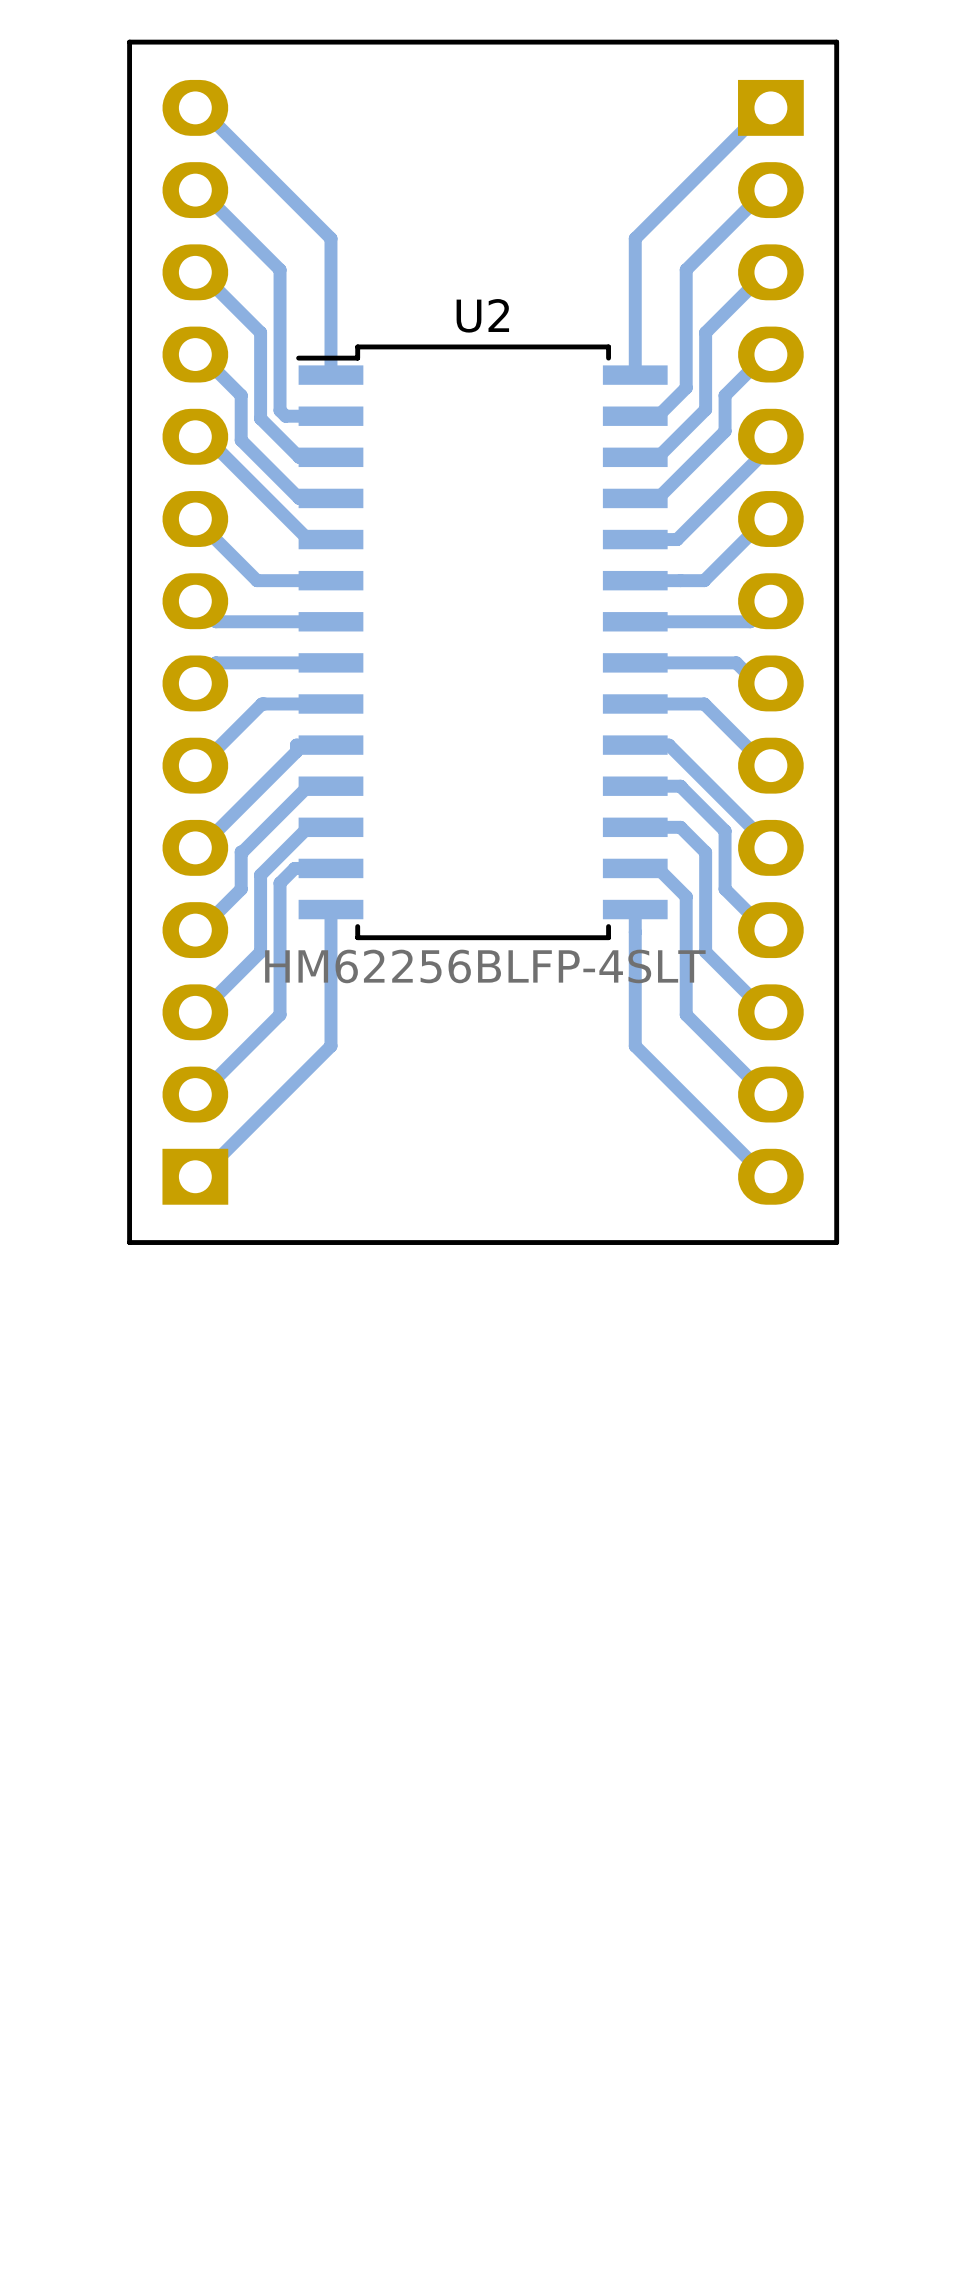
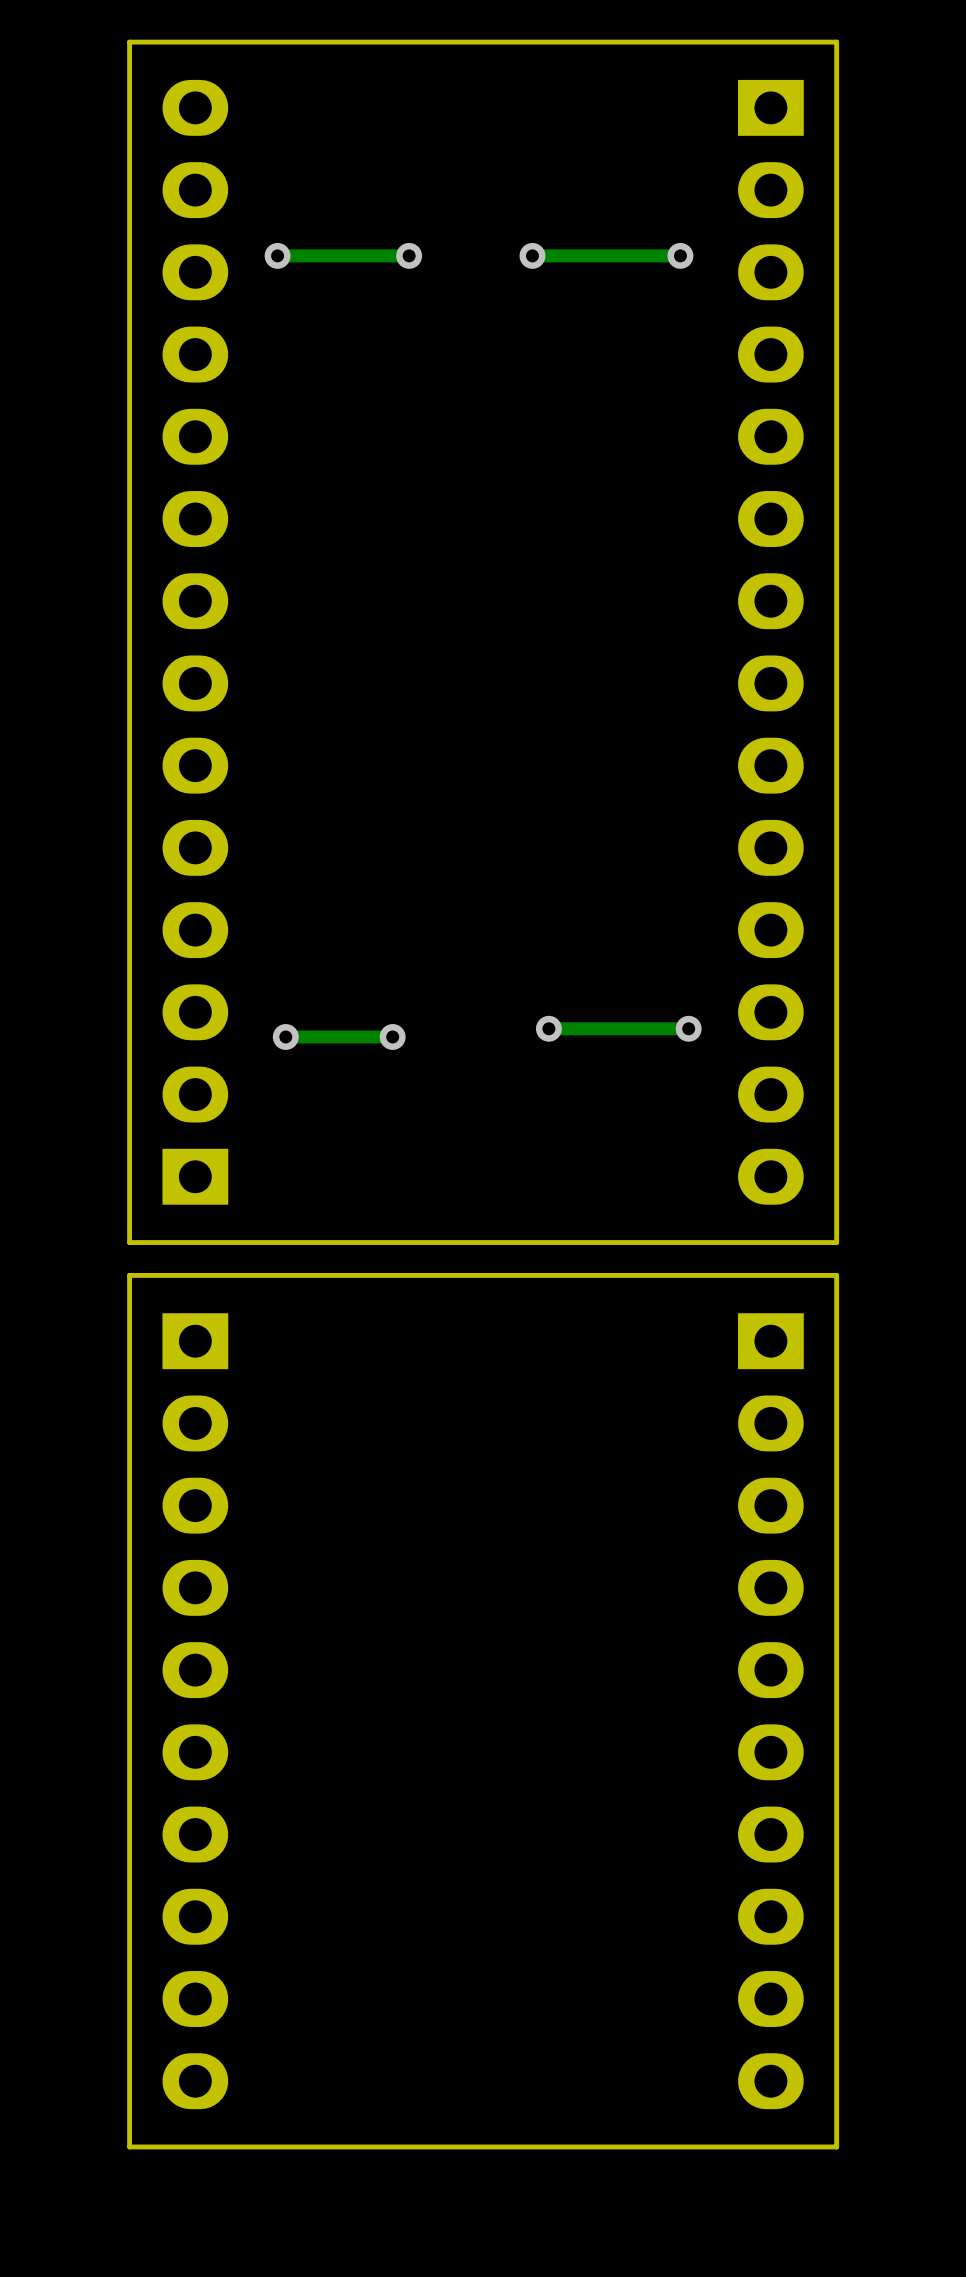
track: (195, 107) (200, 107) (330, 238) (330, 375) -> none
track: (770, 107) (765, 107) (635, 238) (635, 375) -> none
track: (195, 190) (200, 190) (280, 269) (280, 410) (285, 416) (330, 416) -> none
track: (770, 190) (765, 190) (686, 269) (686, 387) (657, 416) (635, 416) -> none
via: none -> (277, 255)
track: none -> (409, 255) (277, 255)
via: none -> (409, 255)
via: none -> (532, 255)
track: none -> (680, 255) (532, 255)
via: none -> (680, 255)
track: (195, 272) (200, 272) (260, 332) (260, 418) (299, 457) (330, 457) -> none
track: (770, 272) (765, 272) (705, 332) (705, 409) (657, 457) (635, 457) -> none
track: (195, 354) (200, 354) (241, 395) (241, 440) (299, 498) (330, 498) -> none
track: (770, 354) (765, 354) (725, 395) (725, 431) (657, 498) (635, 498) -> none
track: (195, 436) (205, 436) (308, 539) (330, 539) -> none
track: (770, 436) (770, 445) (677, 539) (635, 539) -> none
track: (195, 518) (257, 580) (330, 580) -> none
track: (770, 518) (765, 518) (704, 580) (635, 580) -> none
track: (195, 601) (215, 621) (330, 621) -> none
track: (770, 601) (750, 621) (635, 621) -> none
U2: HM62256BLFP-4SLT (481, 642) -> none
track: (330, 662) (215, 662) (195, 683) -> none
track: (635, 662) (736, 662) (756, 683) (770, 683) -> none
track: (330, 703) (261, 703) (200, 765) (195, 765) -> none
track: (635, 703) (704, 703) (765, 765) (770, 765) -> none
track: (330, 745) (296, 745) (296, 751) (200, 847) (195, 847) -> none
track: (635, 745) (668, 745) (770, 847) -> none
track: (330, 786) (308, 786) (241, 851) (241, 889) (200, 930) (195, 930) -> none
track: (635, 786) (680, 786) (725, 830) (725, 889) (765, 930) (770, 930) -> none
track: (330, 827) (308, 827) (260, 875) (260, 951) (200, 1012) (195, 1012) -> none
track: (635, 827) (680, 827) (705, 852) (705, 951) (765, 1012) (770, 1012) -> none
track: (330, 868) (294, 868) (280, 883) (280, 1014) (200, 1094) (195, 1094) -> none
track: (635, 868) (657, 868) (686, 896) (686, 1014) (765, 1094) (770, 1094) -> none
track: (330, 909) (330, 1046) (200, 1176) (195, 1176) -> none
track: (635, 909) (635, 1046) (765, 1176) (770, 1176) -> none
via: none -> (548, 1028)
track: none -> (688, 1028) (548, 1028)
via: none -> (688, 1028)
via: none -> (285, 1036)
track: none -> (392, 1036) (285, 1036)
via: none -> (392, 1036)
board edge: none -> (836, 1275) (836, 2146) (129, 2146) (129, 1275) (836, 1275)
part: none -> (195, 1711)
part: none -> (770, 1711)

